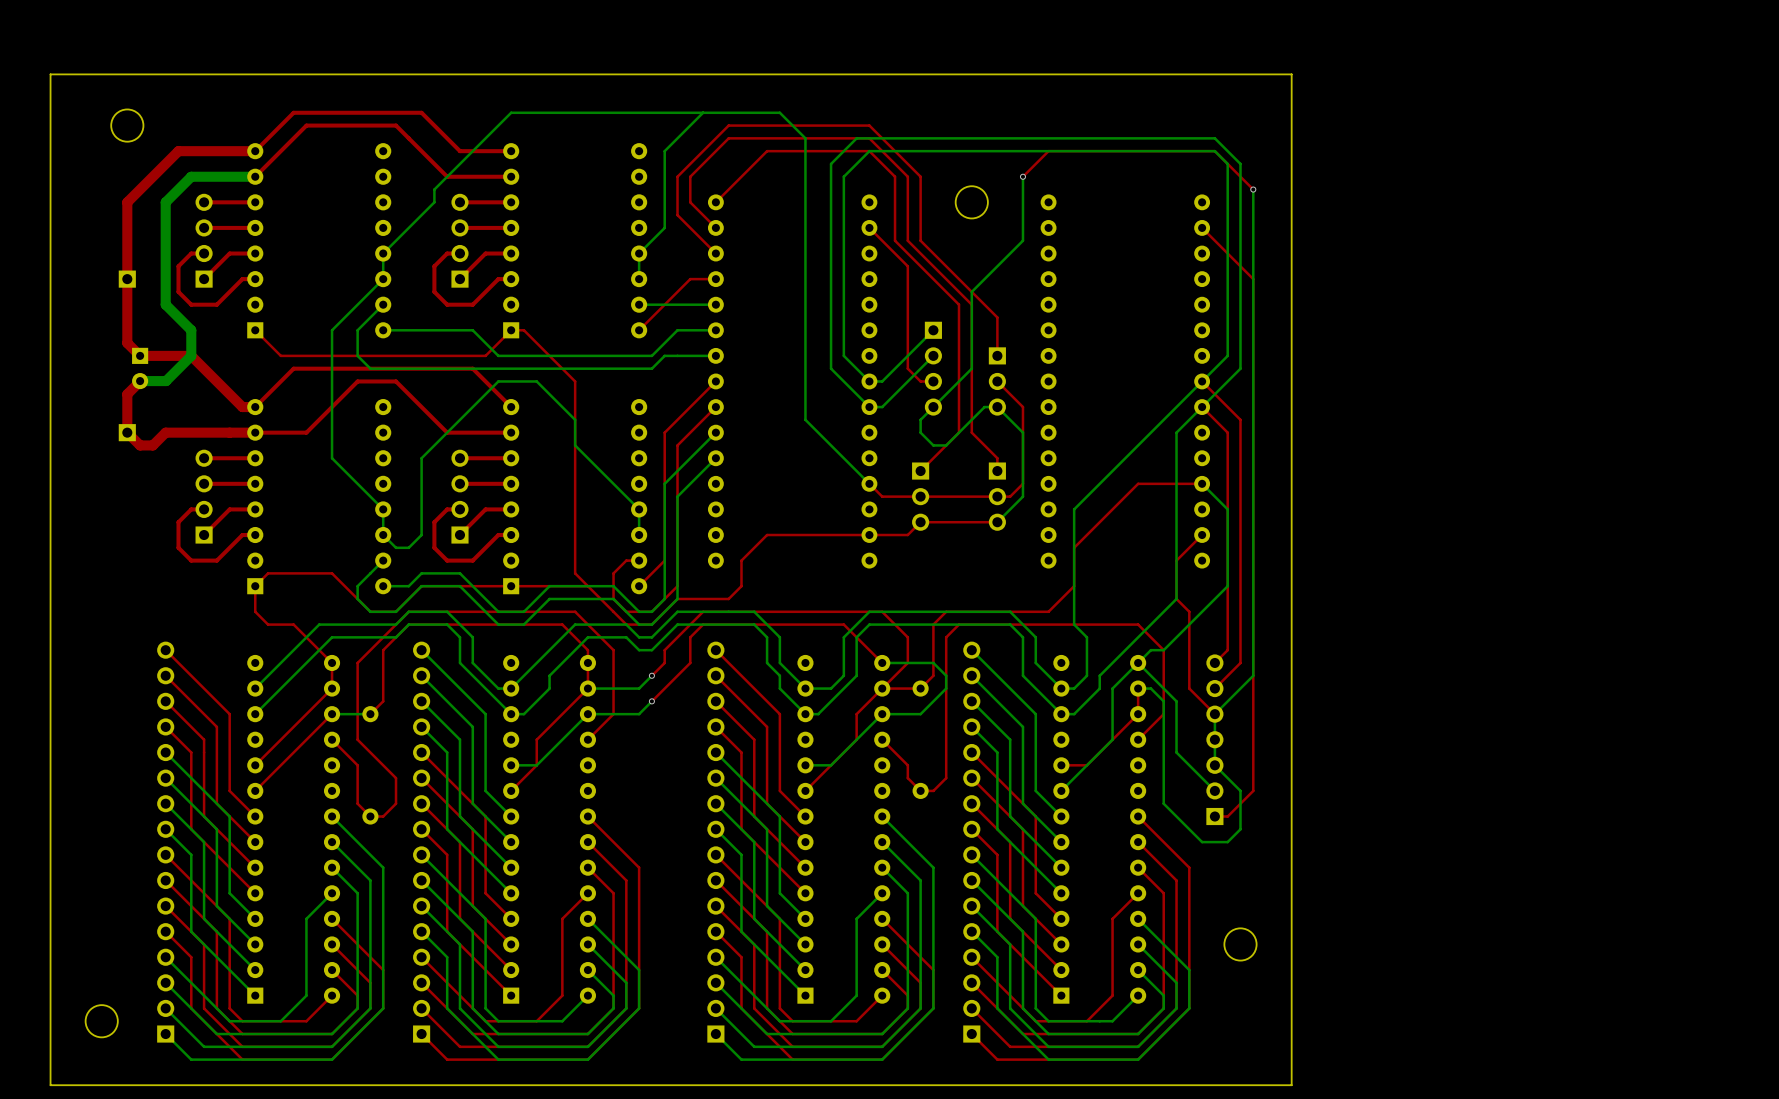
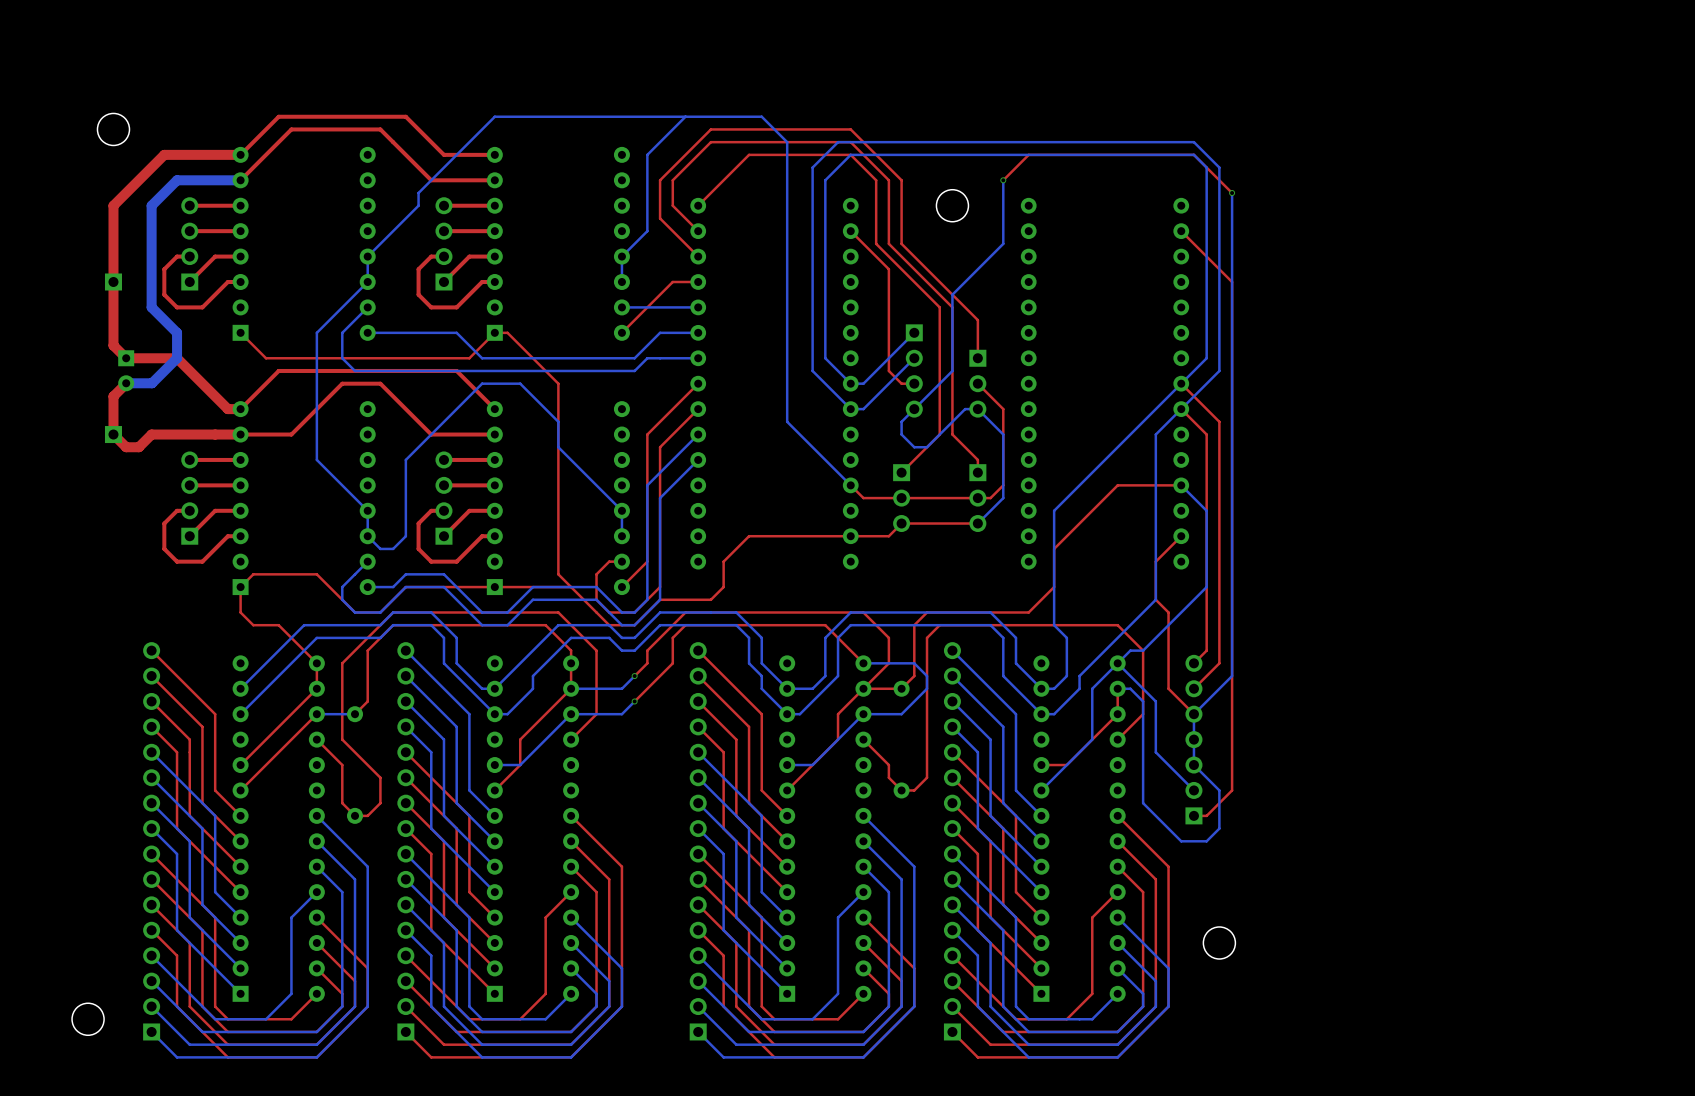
board edge: (1291, 74) (1291, 1085) (50, 1085) (50, 74) (1291, 74) -> none

